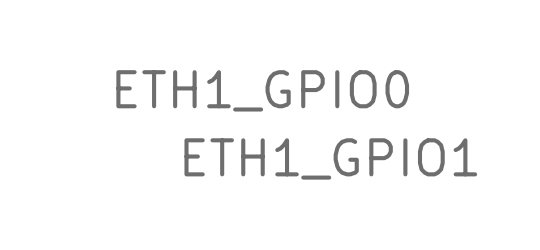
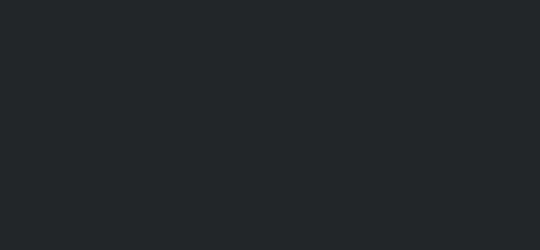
label: ETH1_GPIO0 (262, 90) -> none
label: ETH1_GPIO1 (330, 158) -> none

